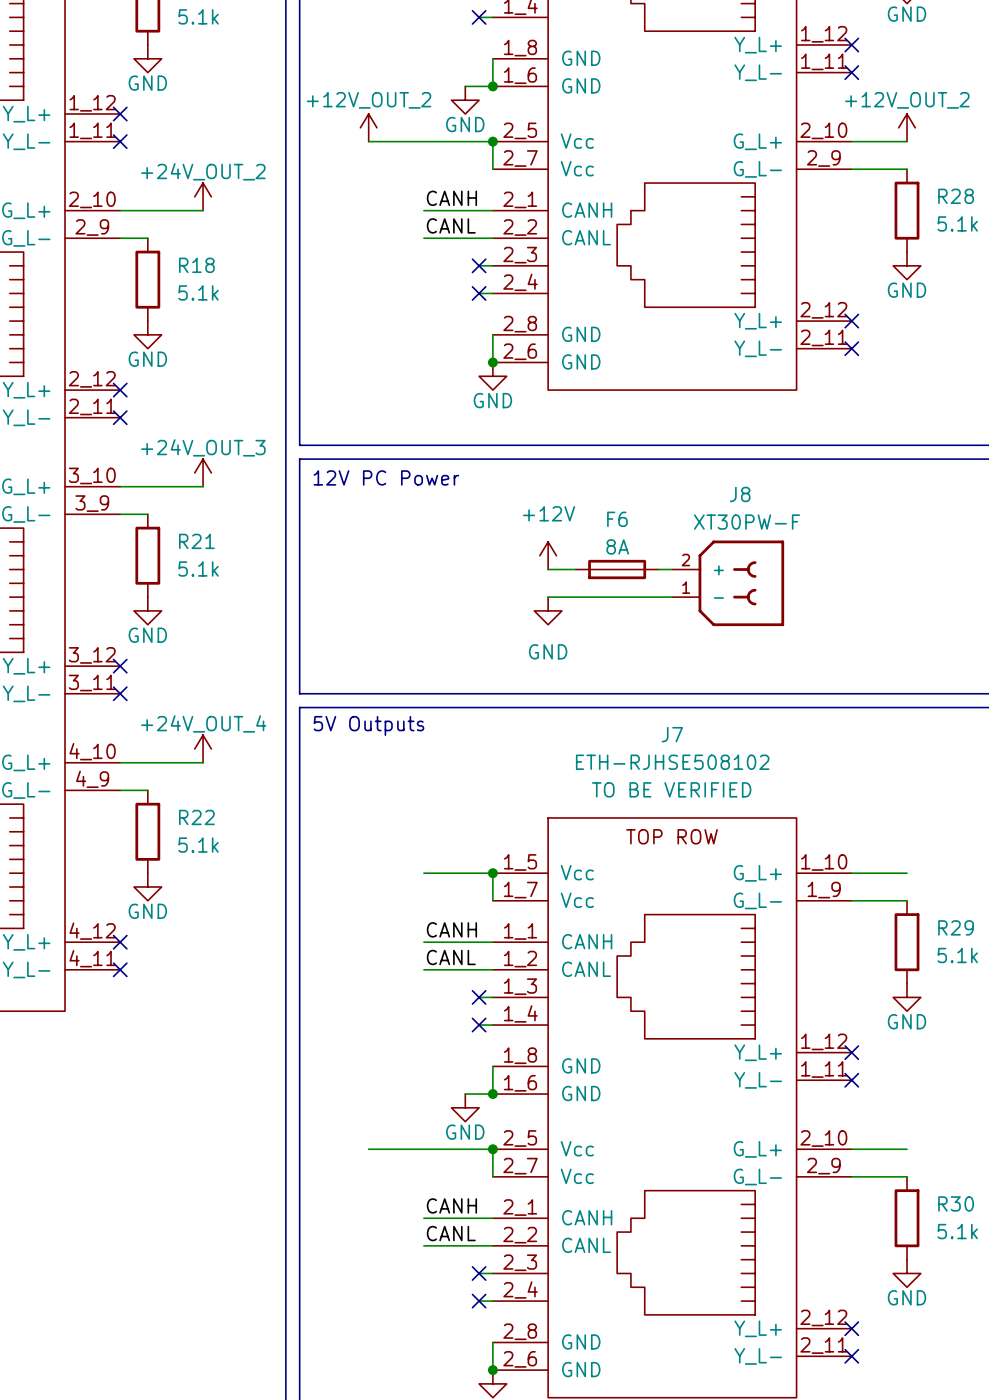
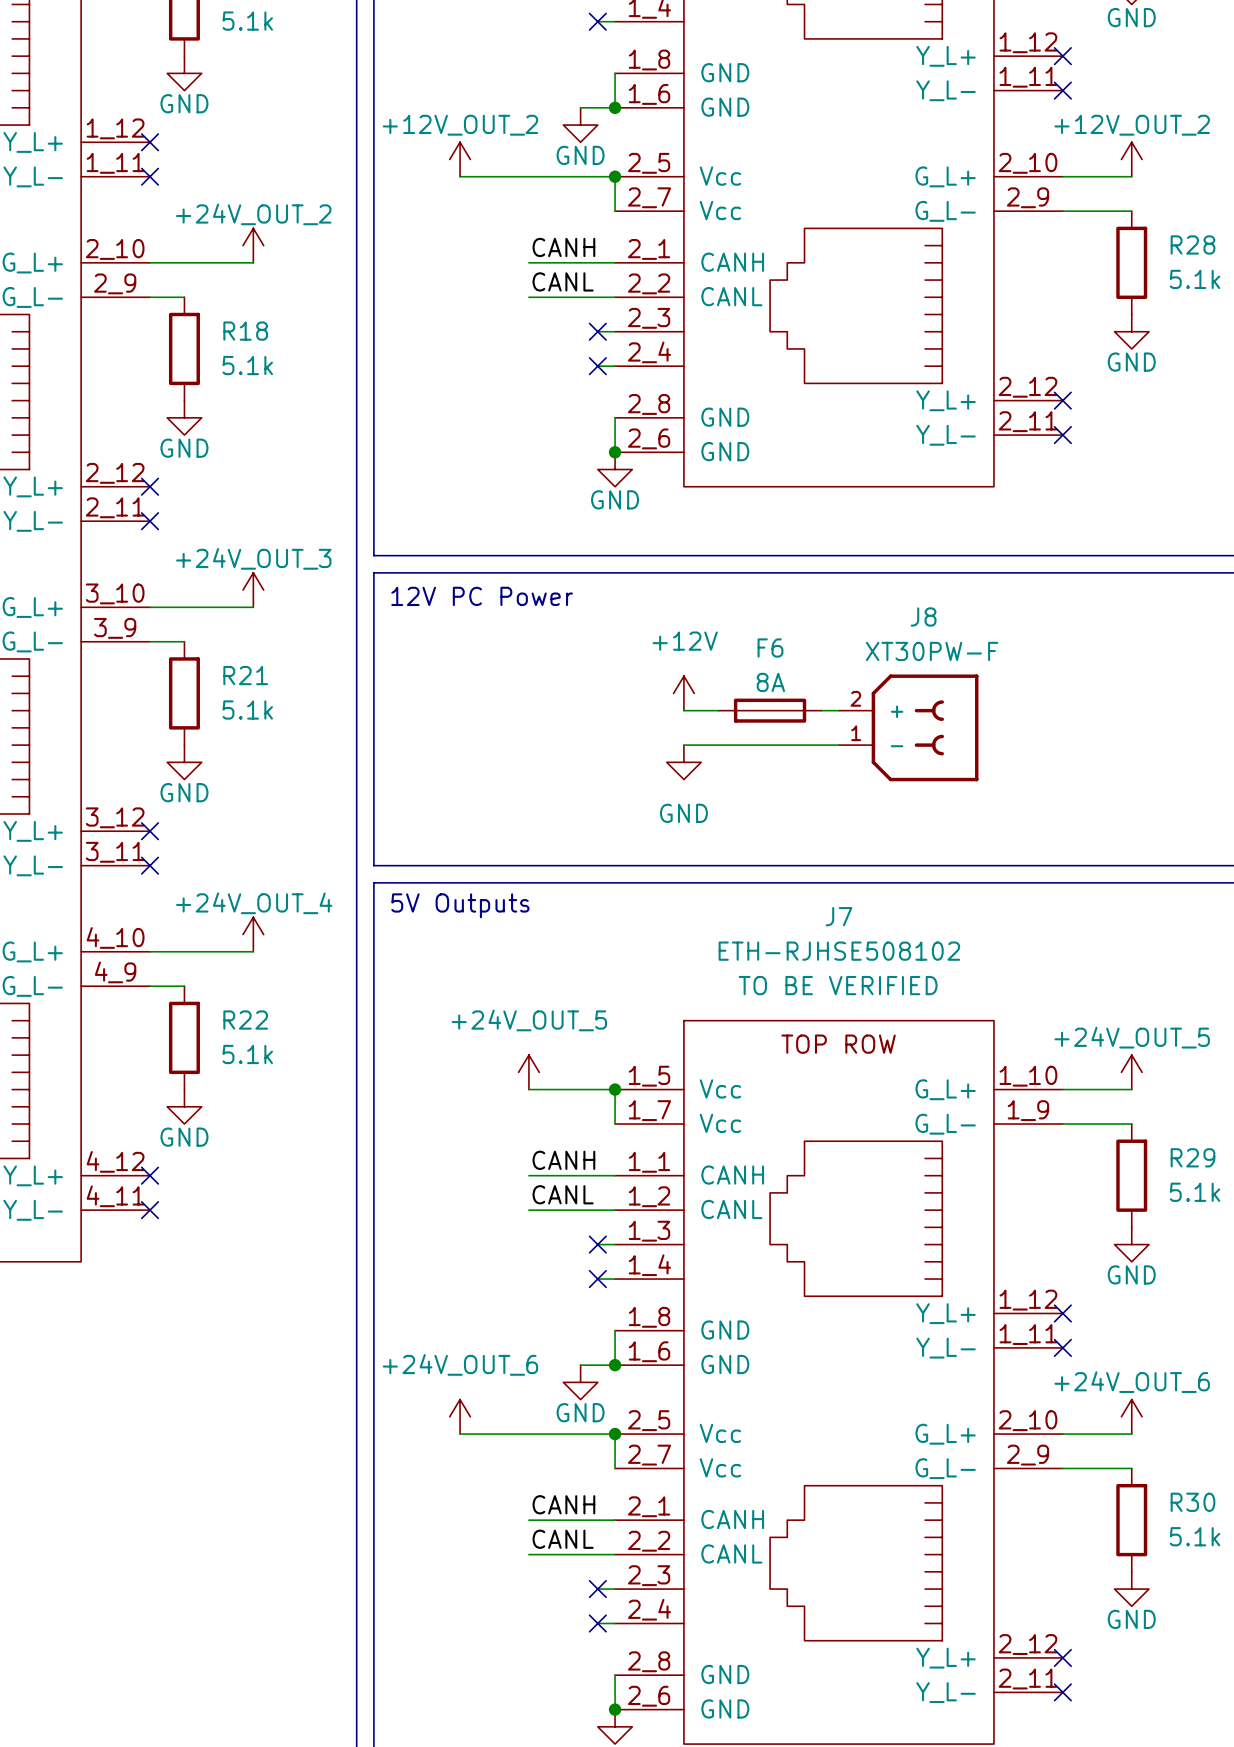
power symbol: none -> +24V_OUT_5 (528, 1072)
power symbol: none -> +24V_OUT_5 (1131, 1072)
power symbol: none -> +24V_OUT_6 (460, 1416)
power symbol: none -> +24V_OUT_6 (1131, 1416)

